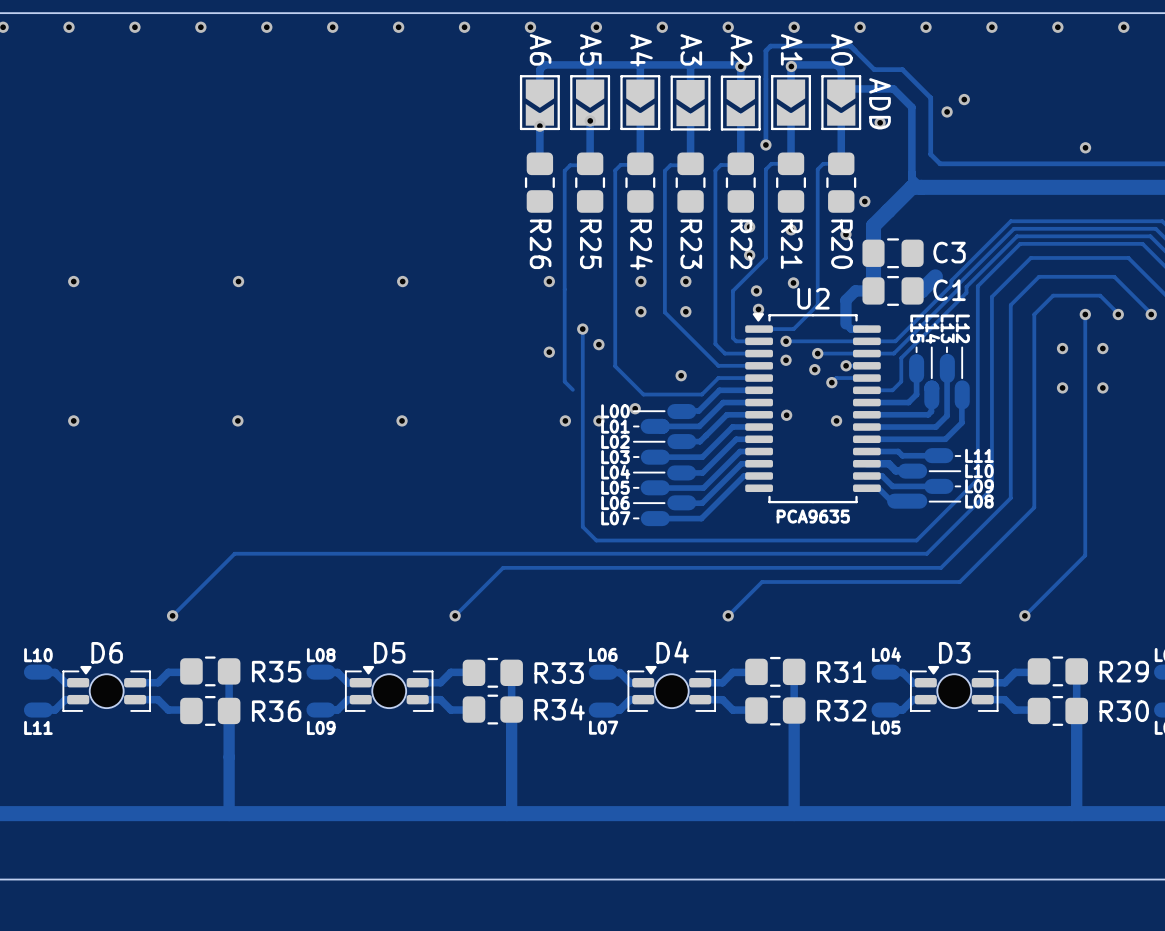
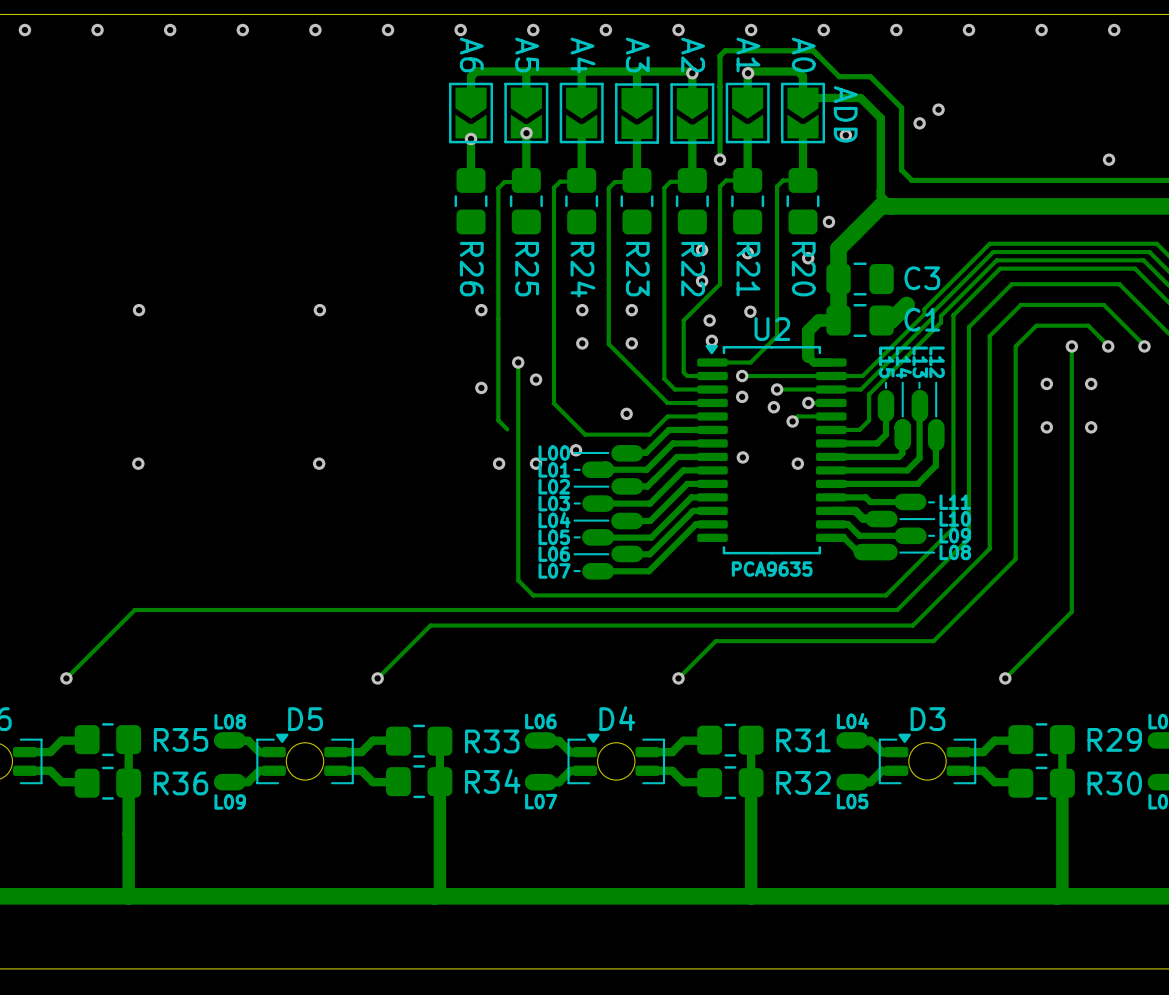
via position: (1085, 147) -> (1109, 159)

